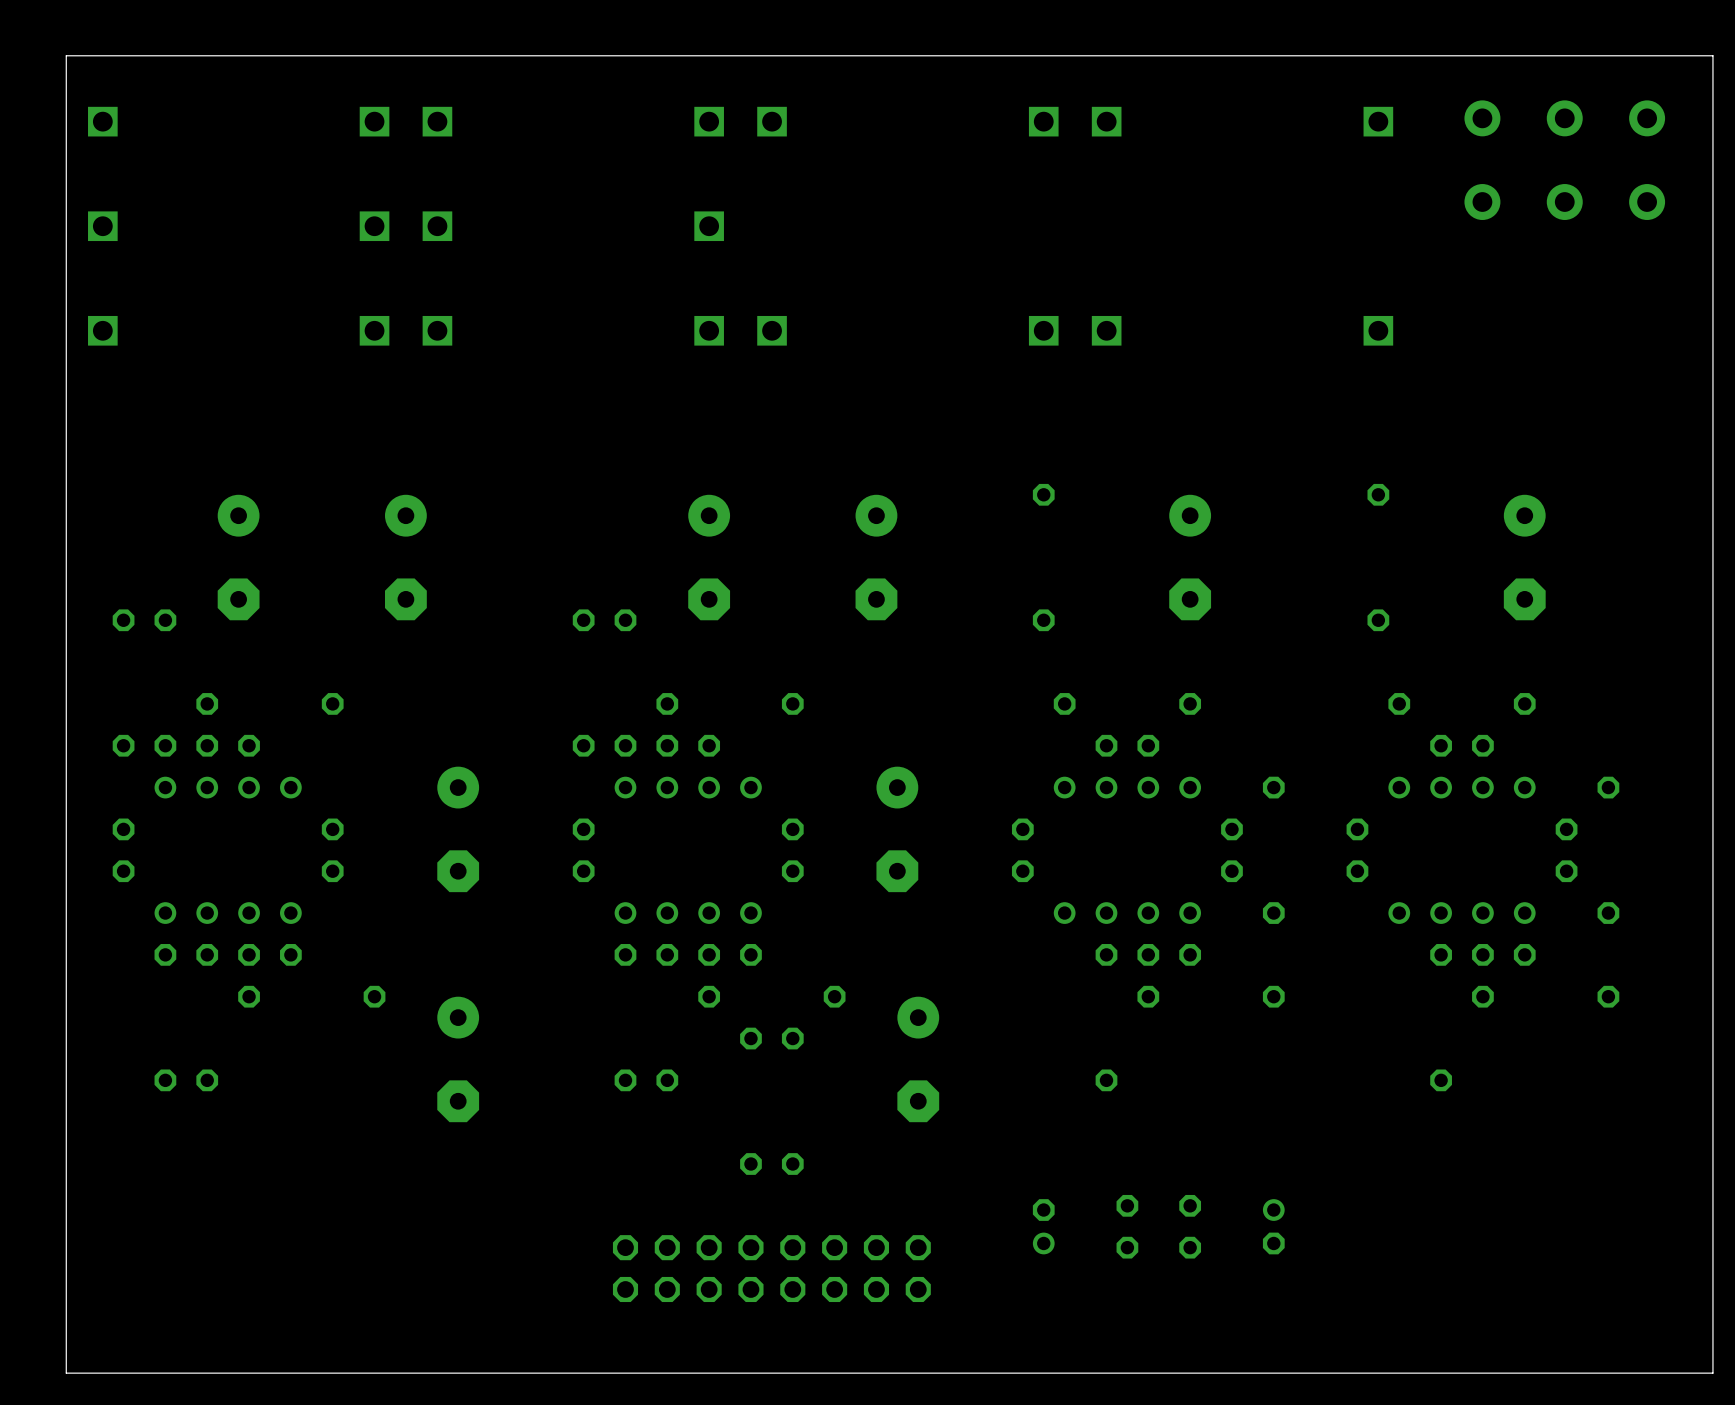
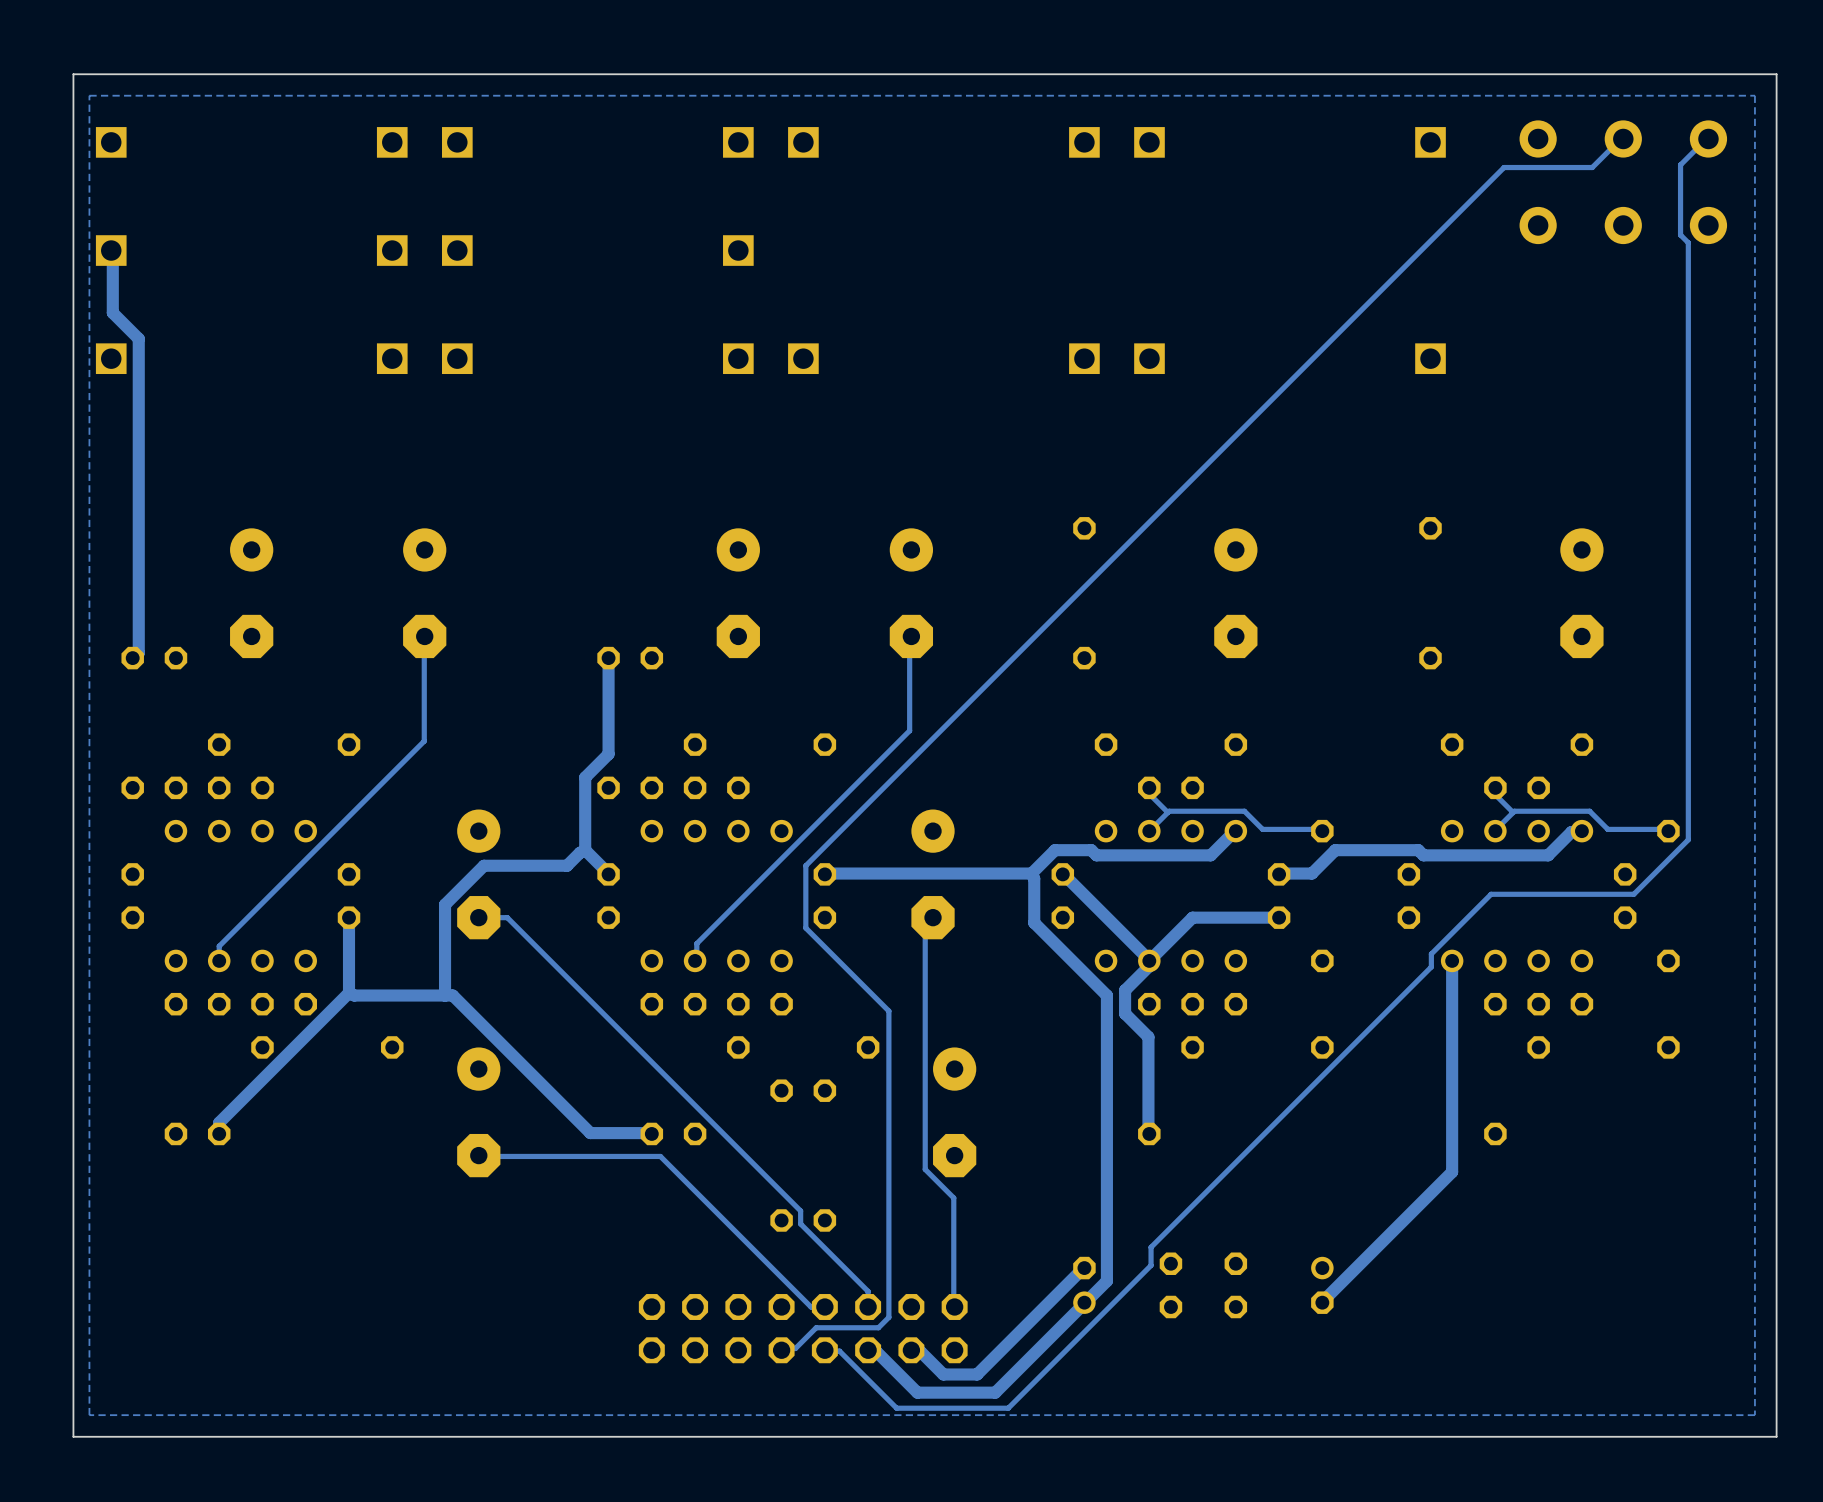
zone outline: none -> (1754, 95) (89, 95) (89, 1415) (1754, 1415) (1754, 95)
track: none -> (1623, 138) (1620, 138) (1592, 167) (1504, 167) (805, 865) (805, 928) (888, 1011) (888, 1317) (878, 1327) (816, 1327) (795, 1348) (782, 1348) (781, 1350)
track: none -> (1708, 138) (1680, 164) (1680, 235) (1688, 242) (1688, 839) (1633, 894) (1491, 894) (1431, 954) (1431, 966) (1151, 1247) (1151, 1265) (1008, 1408) (896, 1408) (839, 1351) (824, 1350)
track: none -> (111, 250) (112, 250) (112, 312) (138, 338) (138, 652) (132, 658)
track: none -> (424, 636) (424, 741) (219, 946) (219, 960)
track: none -> (911, 636) (909, 637) (909, 730) (696, 943) (696, 959) (695, 960)
track: none -> (608, 658) (608, 754) (585, 777) (585, 850)
track: none -> (1149, 787) (1151, 787) (1151, 795) (1167, 812)
track: none -> (1495, 787) (1496, 795) (1513, 812)
track: none -> (1235, 831) (1210, 855) (1096, 855) (1091, 850) (1055, 850) (1031, 873)
track: none -> (1322, 831) (1322, 829) (1262, 829) (1244, 811) (1169, 811) (1149, 831)
track: none -> (1581, 831) (1571, 832) (1548, 855) (1423, 855) (1418, 850) (1335, 850) (1311, 873) (1279, 874)
track: none -> (1668, 831) (1667, 829) (1607, 829) (1589, 811) (1514, 811) (1495, 831)
track: none -> (585, 850) (608, 874)
track: none -> (585, 850) (567, 865) (483, 865) (445, 904) (445, 995)
track: none -> (1031, 873) (824, 874)
track: none -> (1031, 873) (1034, 878) (1034, 922) (1106, 995) (1106, 1281) (995, 1392) (917, 1392) (875, 1351) (868, 1350)
track: none -> (1062, 874) (1149, 960)
track: none -> (349, 917) (349, 992)
track: none -> (478, 917) (507, 917) (800, 1210) (800, 1223) (868, 1291) (868, 1307)
track: none -> (933, 917) (925, 925) (925, 1169) (953, 1197) (954, 1307)
track: none -> (1279, 917) (1192, 917) (1149, 960)
track: none -> (1149, 960) (1148, 966) (1125, 990) (1125, 1013) (1148, 1037) (1149, 1133)
track: none -> (1452, 960) (1452, 1172) (1322, 1302)
track: none -> (349, 992) (219, 1122) (219, 1133)
track: none -> (349, 992) (354, 995) (452, 995) (590, 1133) (651, 1133)
track: none -> (478, 1155) (660, 1156) (811, 1307) (824, 1307)
track: none -> (1084, 1268) (977, 1374) (943, 1374) (920, 1351) (911, 1350)

